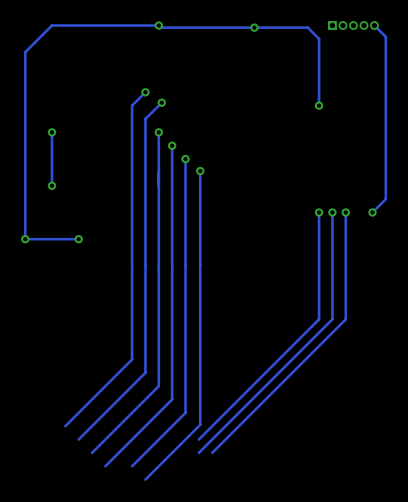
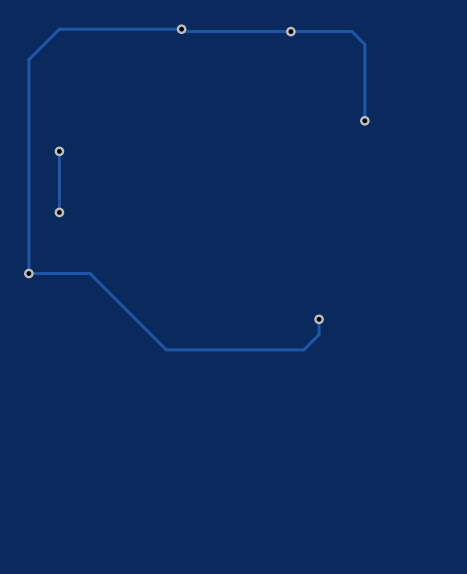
part: (353, 25) -> none
track: (374, 25) (385, 36) (385, 199) (372, 212) -> none
track: (145, 92) (132, 105) (132, 359) (65, 426) -> none
via: (145, 92) -> none
track: (161, 102) (145, 119) (145, 372) (78, 439) -> none
via: (161, 102) -> none
track: (158, 132) (158, 386) (92, 452) -> none
via: (158, 132) -> none
track: (172, 145) (172, 399) (105, 466) -> none
via: (172, 145) -> none
track: (185, 159) (185, 412) (132, 466) -> none
via: (185, 159) -> none
track: (200, 171) (200, 424) (145, 479) -> none
via: (200, 171) -> none
track: (319, 212) (319, 319) (198, 439) -> none
via: (319, 212) -> none
track: (332, 212) (332, 319) (198, 452) -> none
via: (332, 212) -> none
track: (345, 212) (345, 319) (212, 452) -> none
via: (345, 212) -> none
via: (372, 212) -> none
track: none -> (89, 273) (166, 349) (303, 349) (319, 334) (319, 319)
via: (78, 239) -> none
via: none -> (319, 319)

